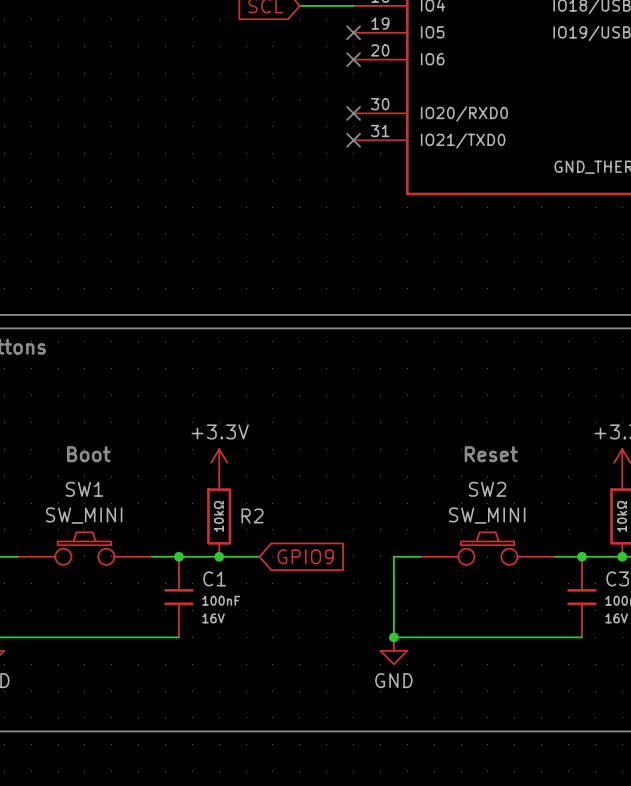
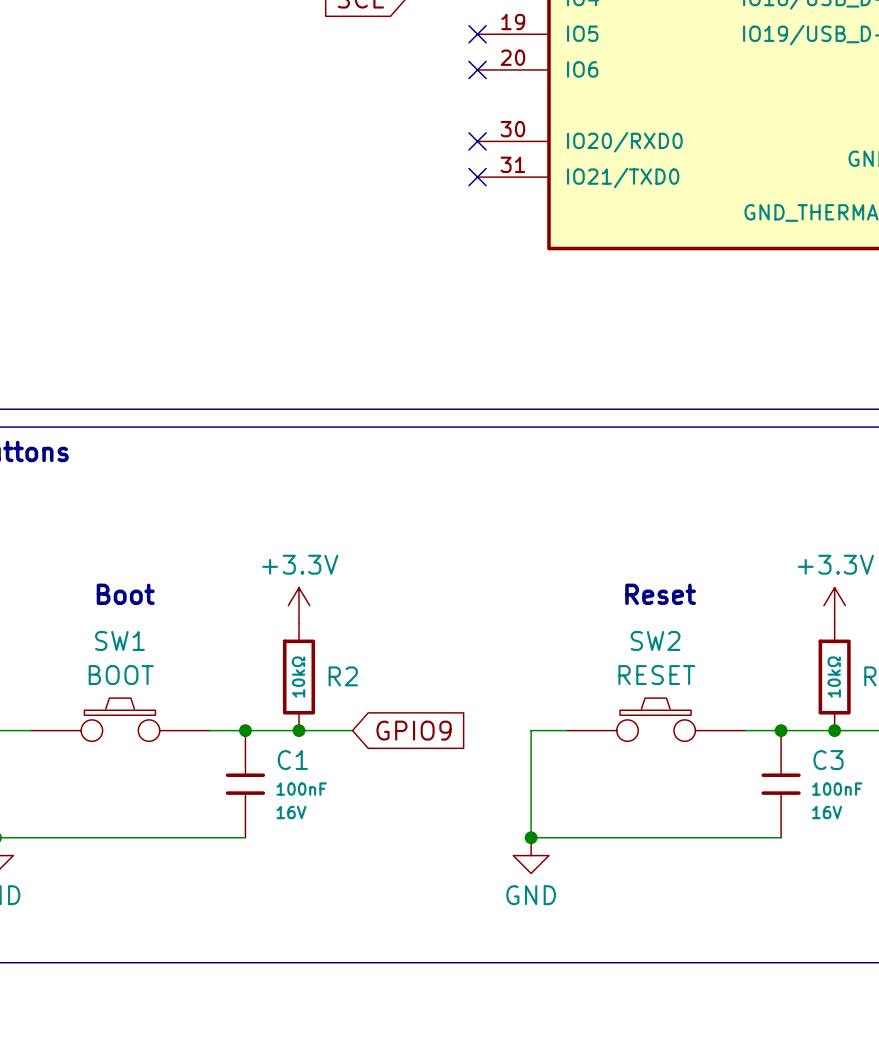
SW1 value: SW_MINI (84, 515) -> BOOT (121, 675)
SW2 value: SW_MINI (487, 515) -> RESET (656, 675)

